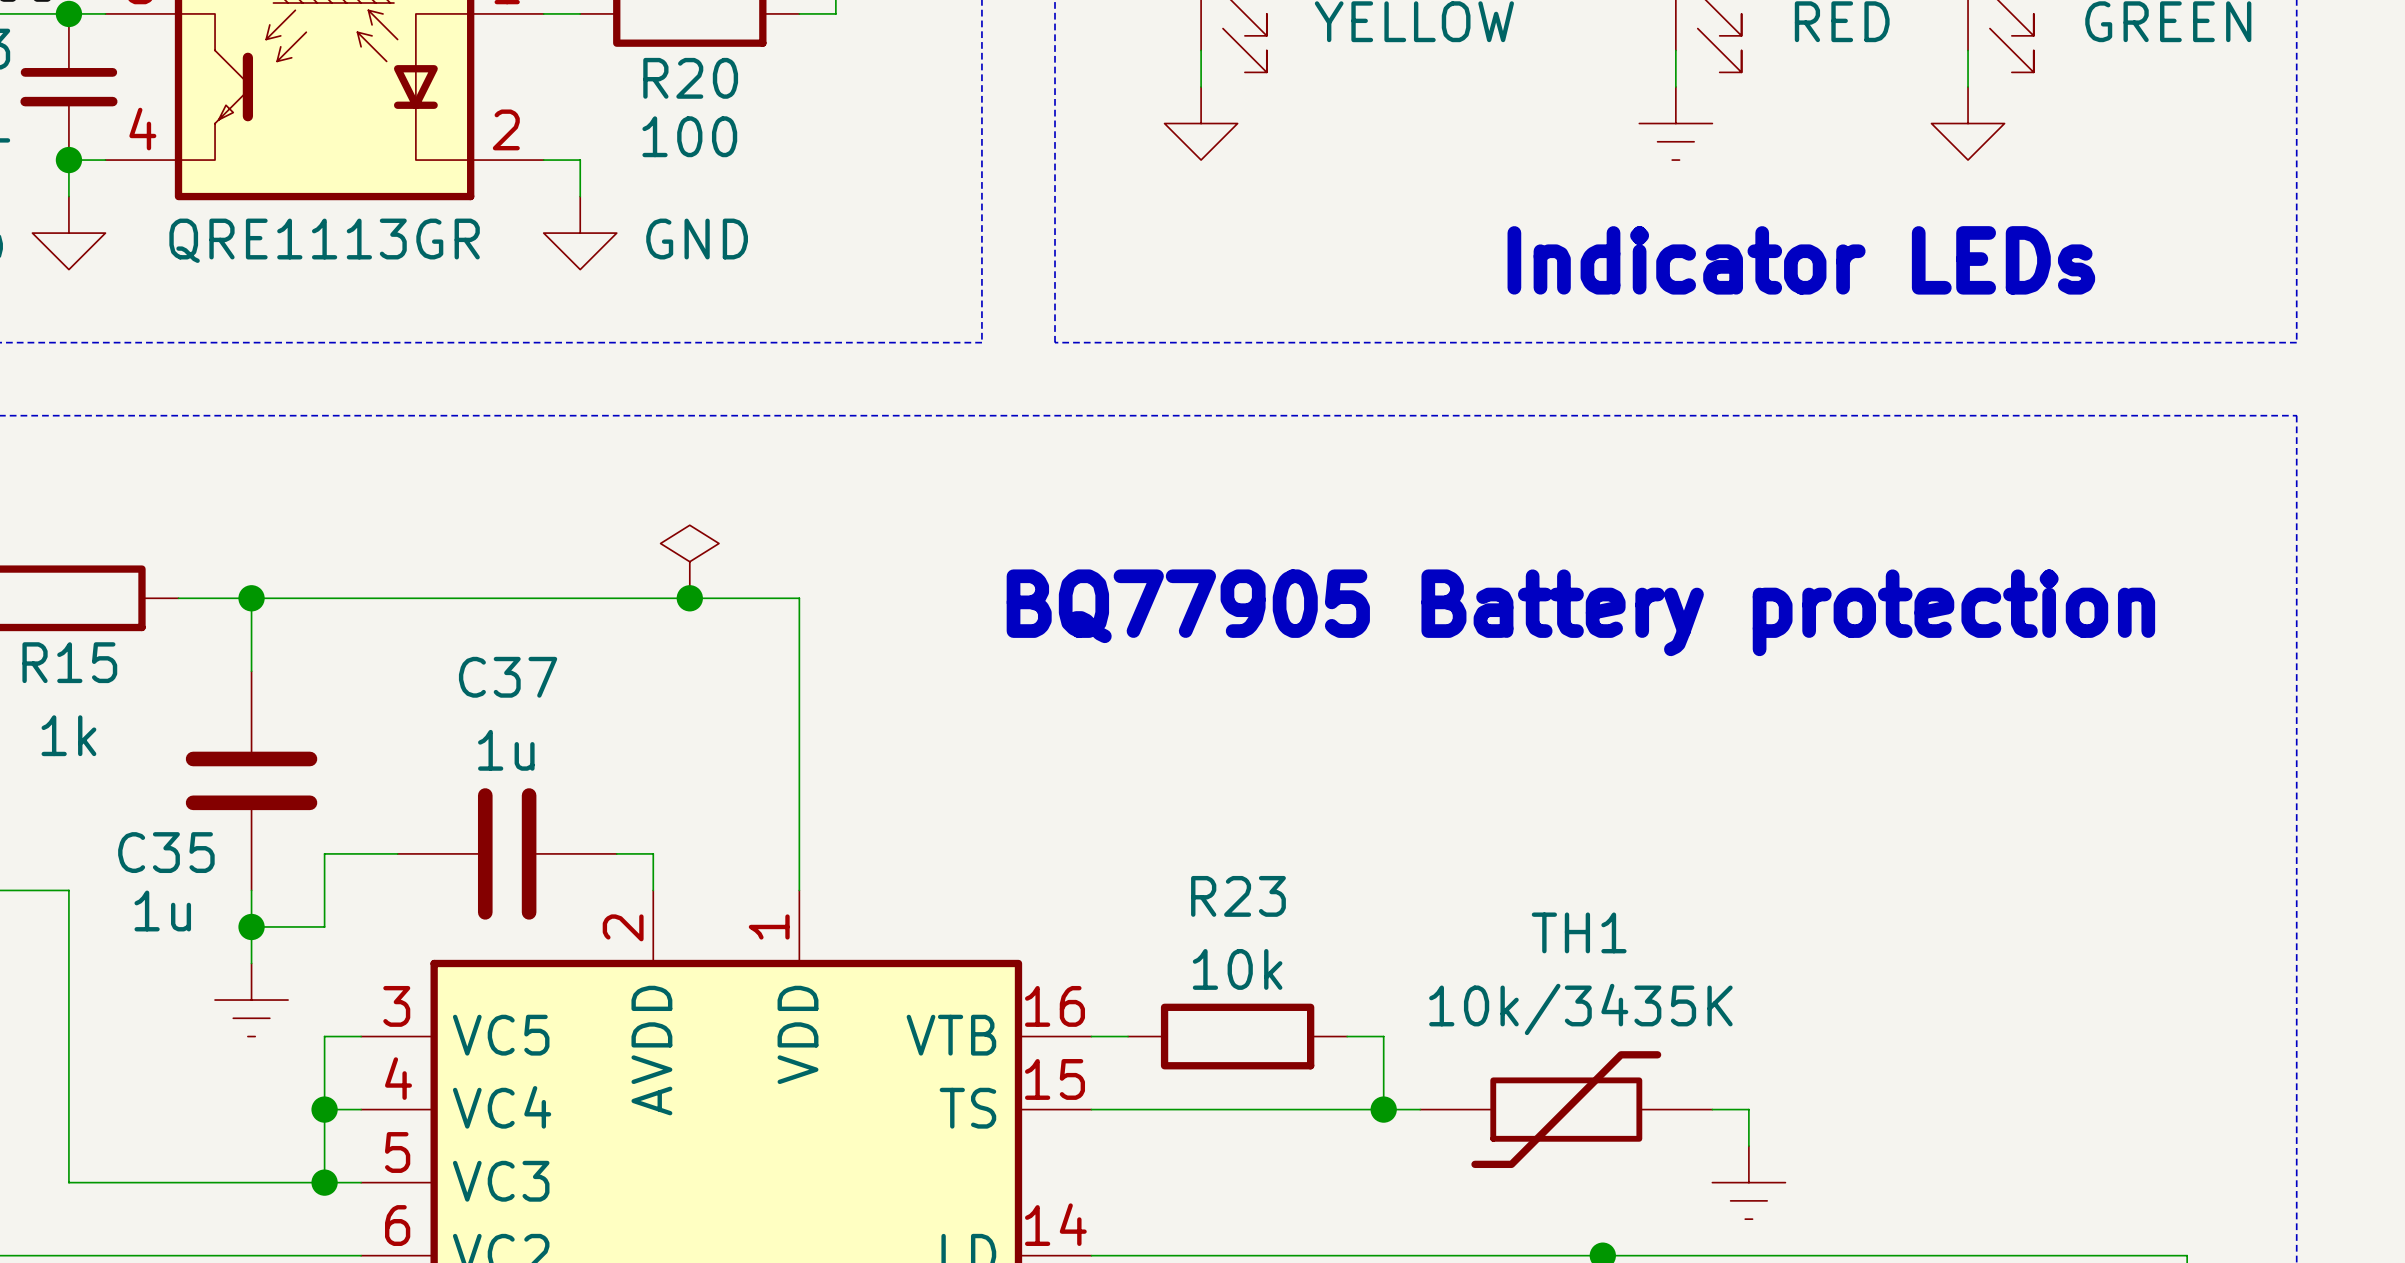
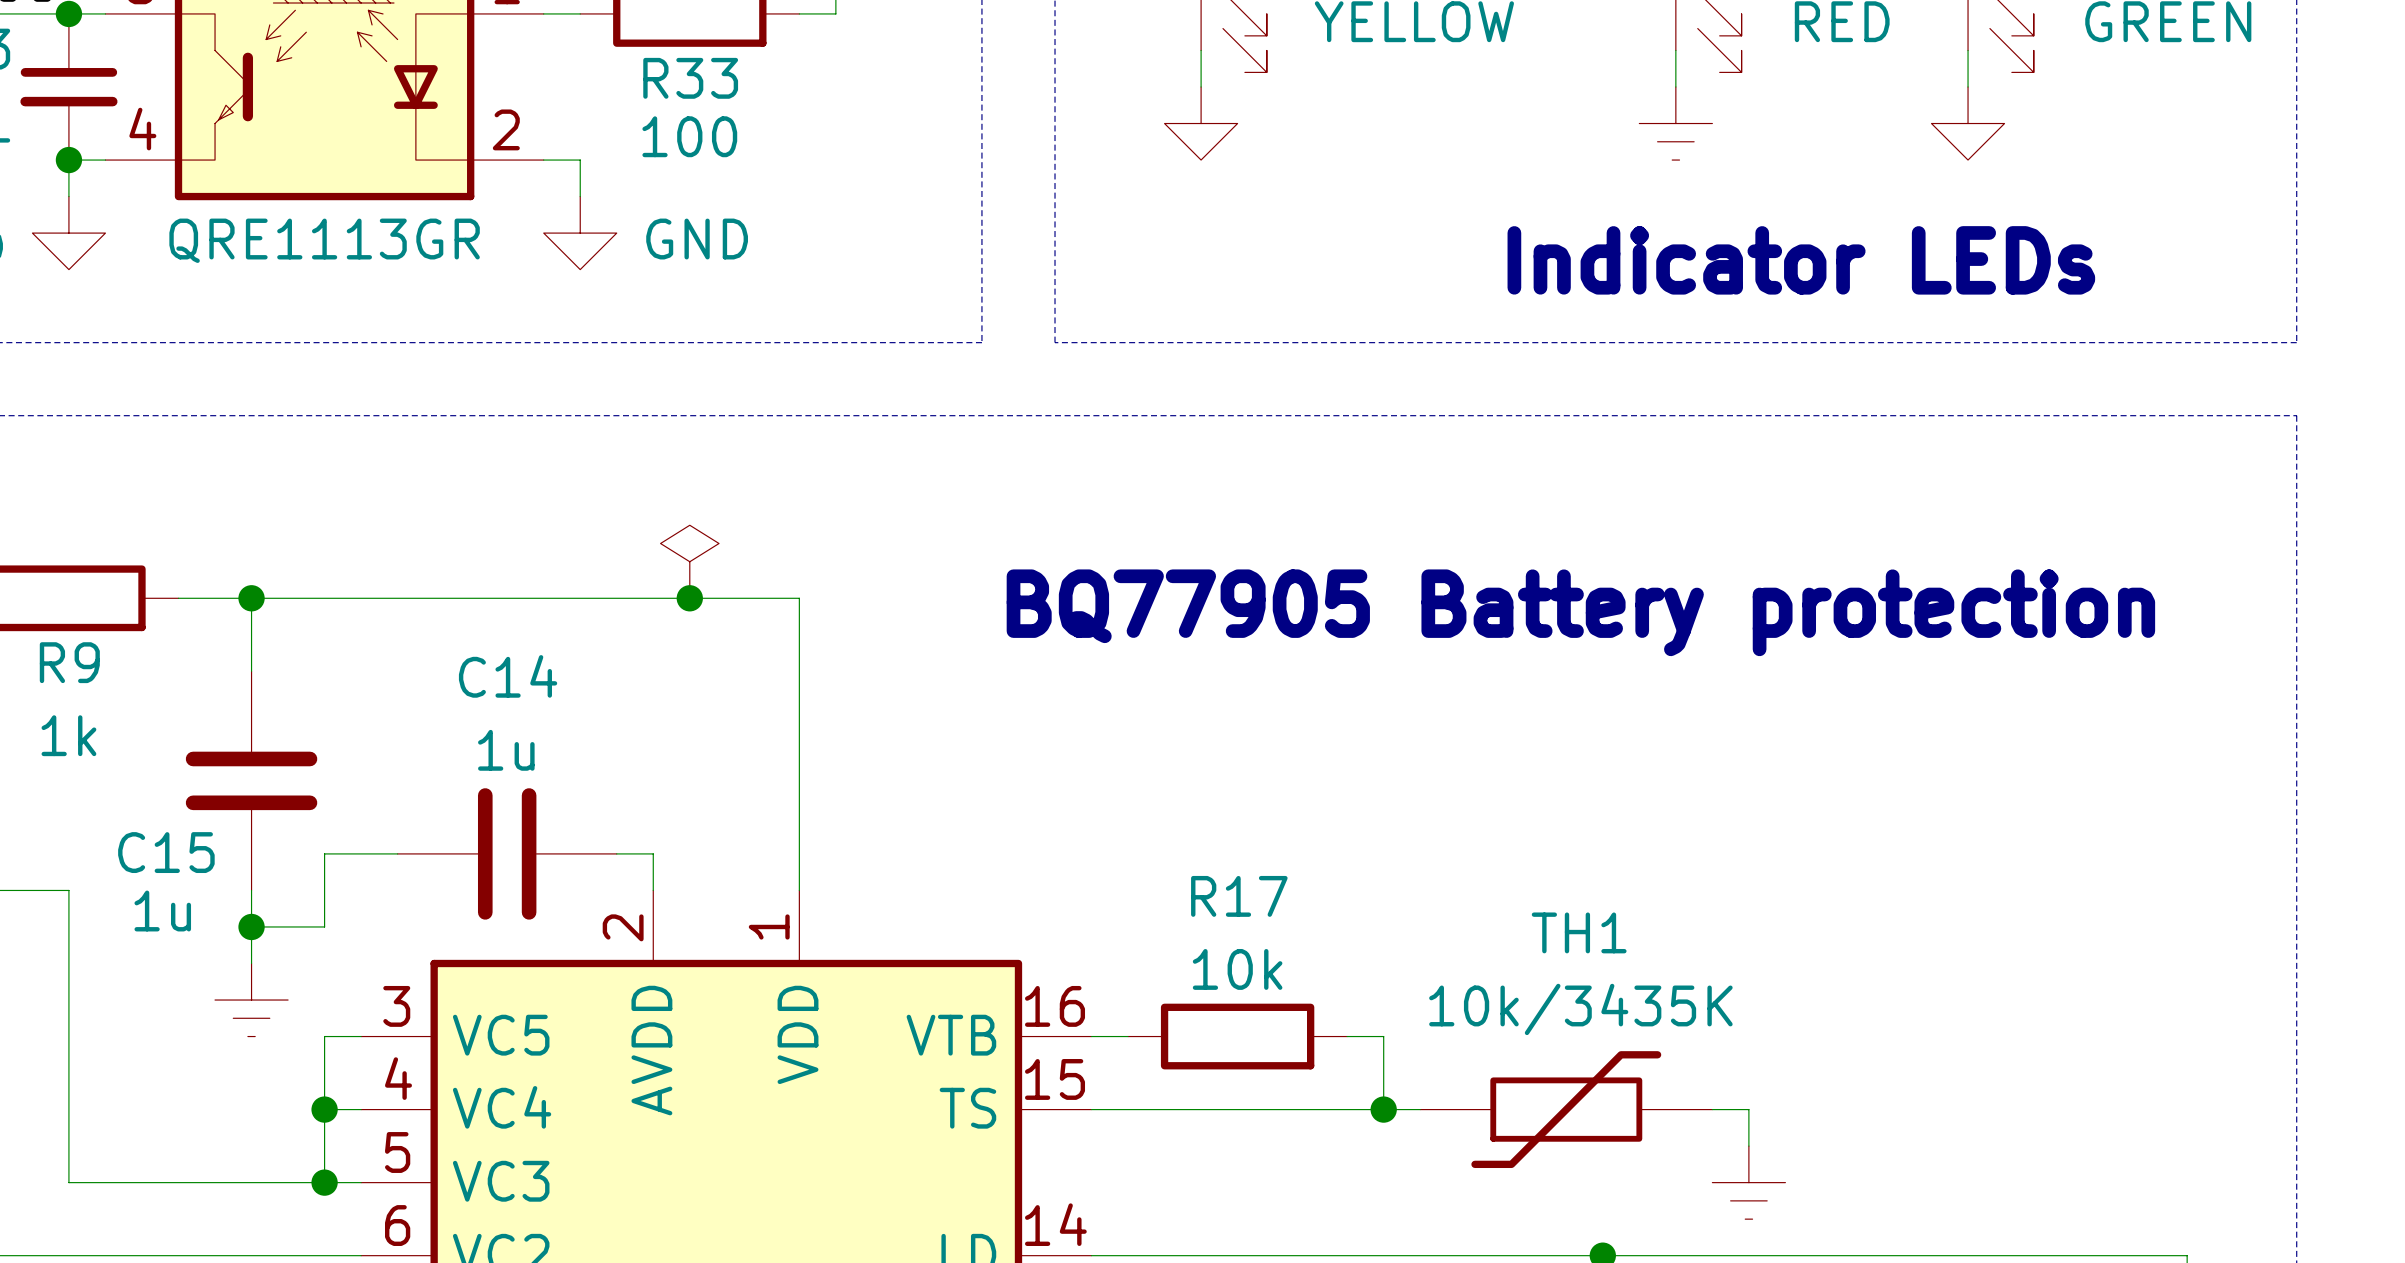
R20 name: R20 (690, 78) -> R33 (690, 78)
R15 name: R15 (69, 662) -> R9 (69, 662)
C37 name: C37 (508, 677) -> C14 (508, 676)
C35 name: C35 (166, 852) -> C15 (166, 852)
R23 name: R23 (1238, 896) -> R17 (1239, 896)

